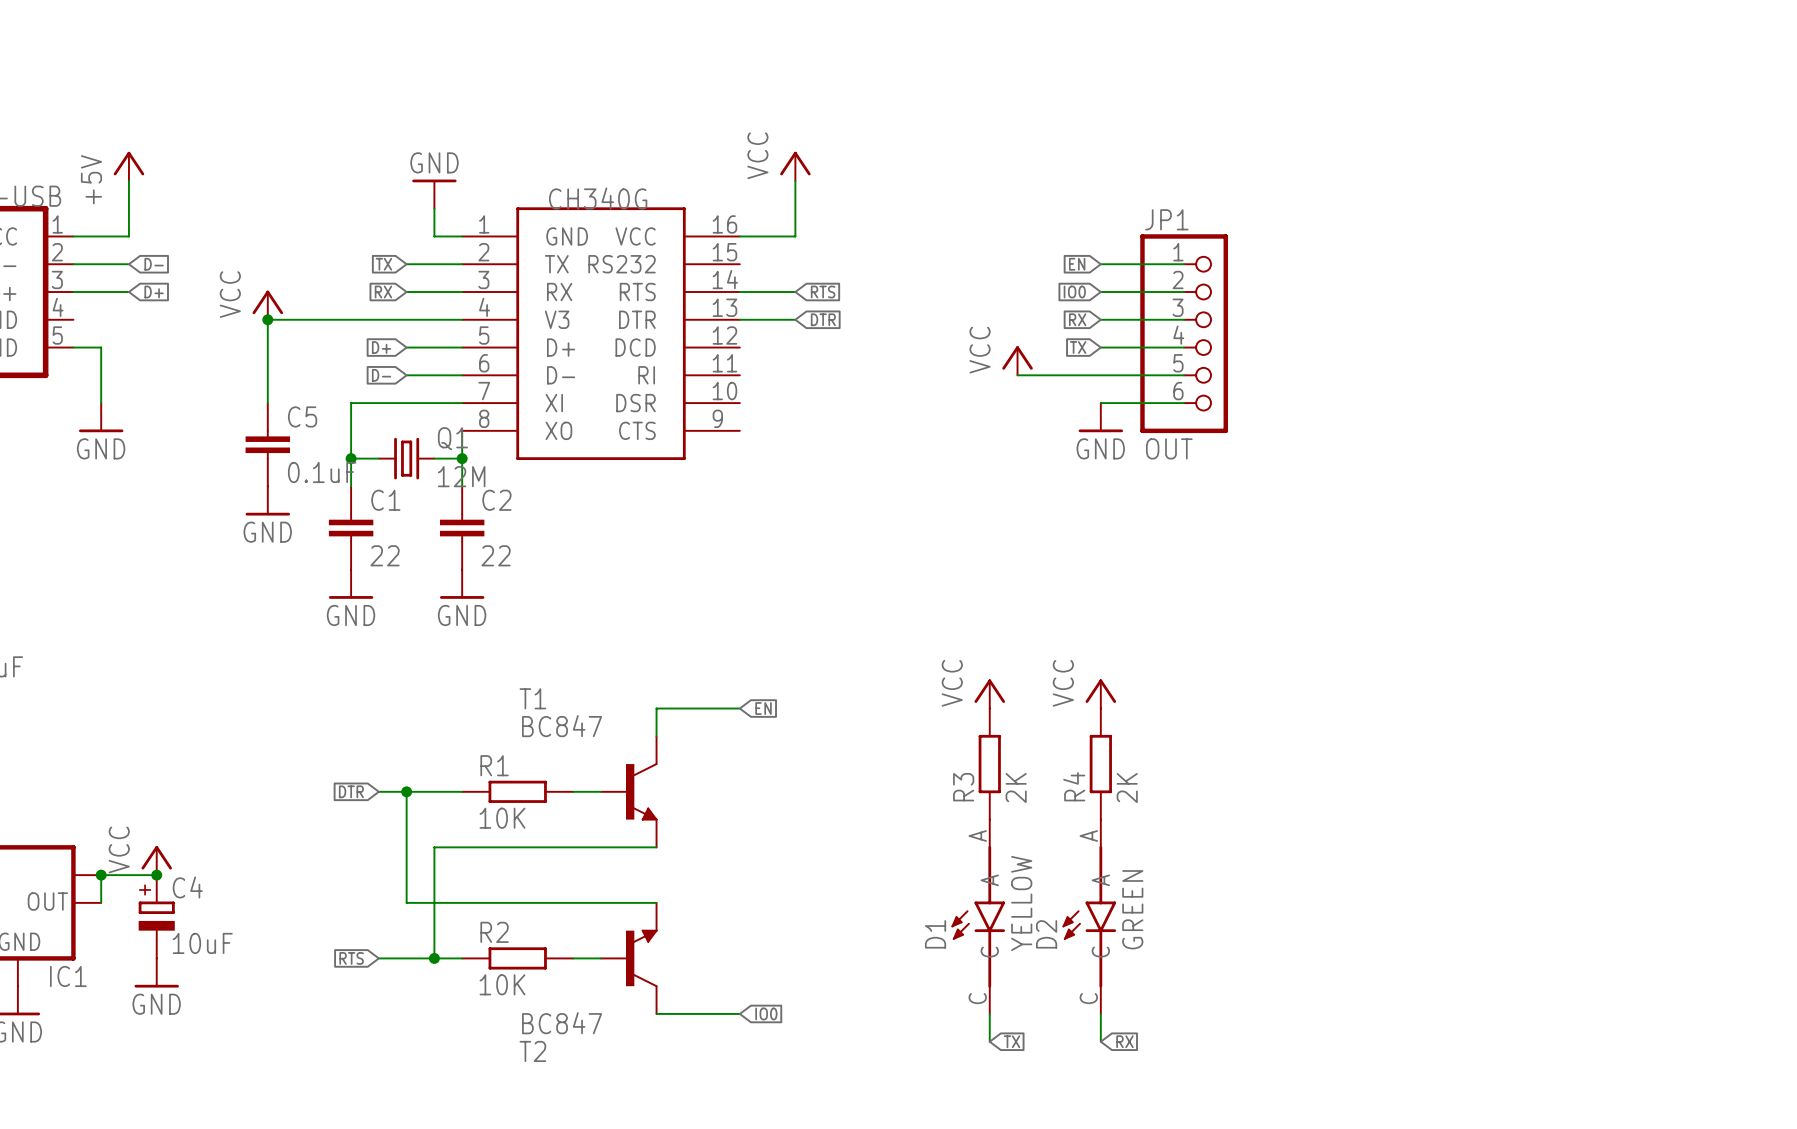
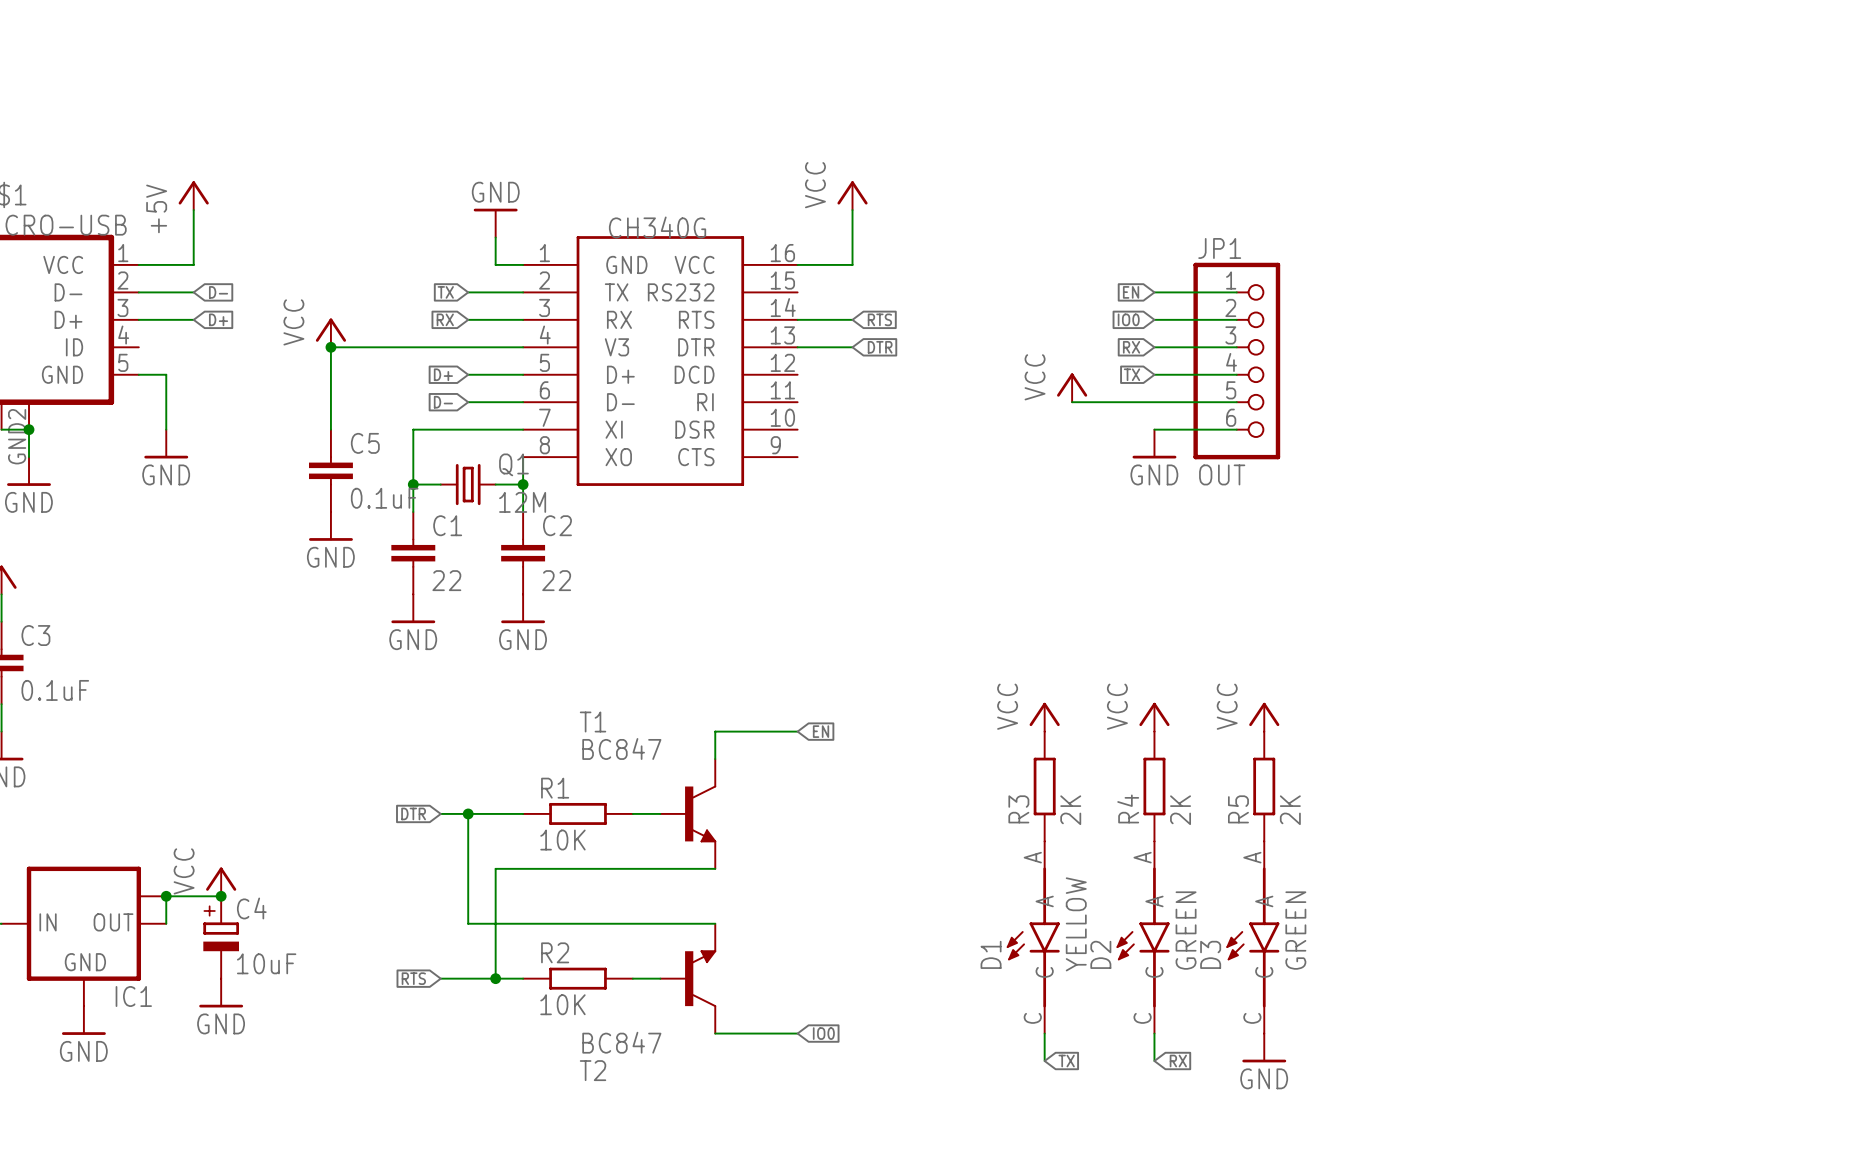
power symbol: none -> VCC (1264, 717)
R5: none -> 2K (1264, 786)
D3: none -> GREEN (1252, 937)
power symbol: none -> GND (1264, 1047)

